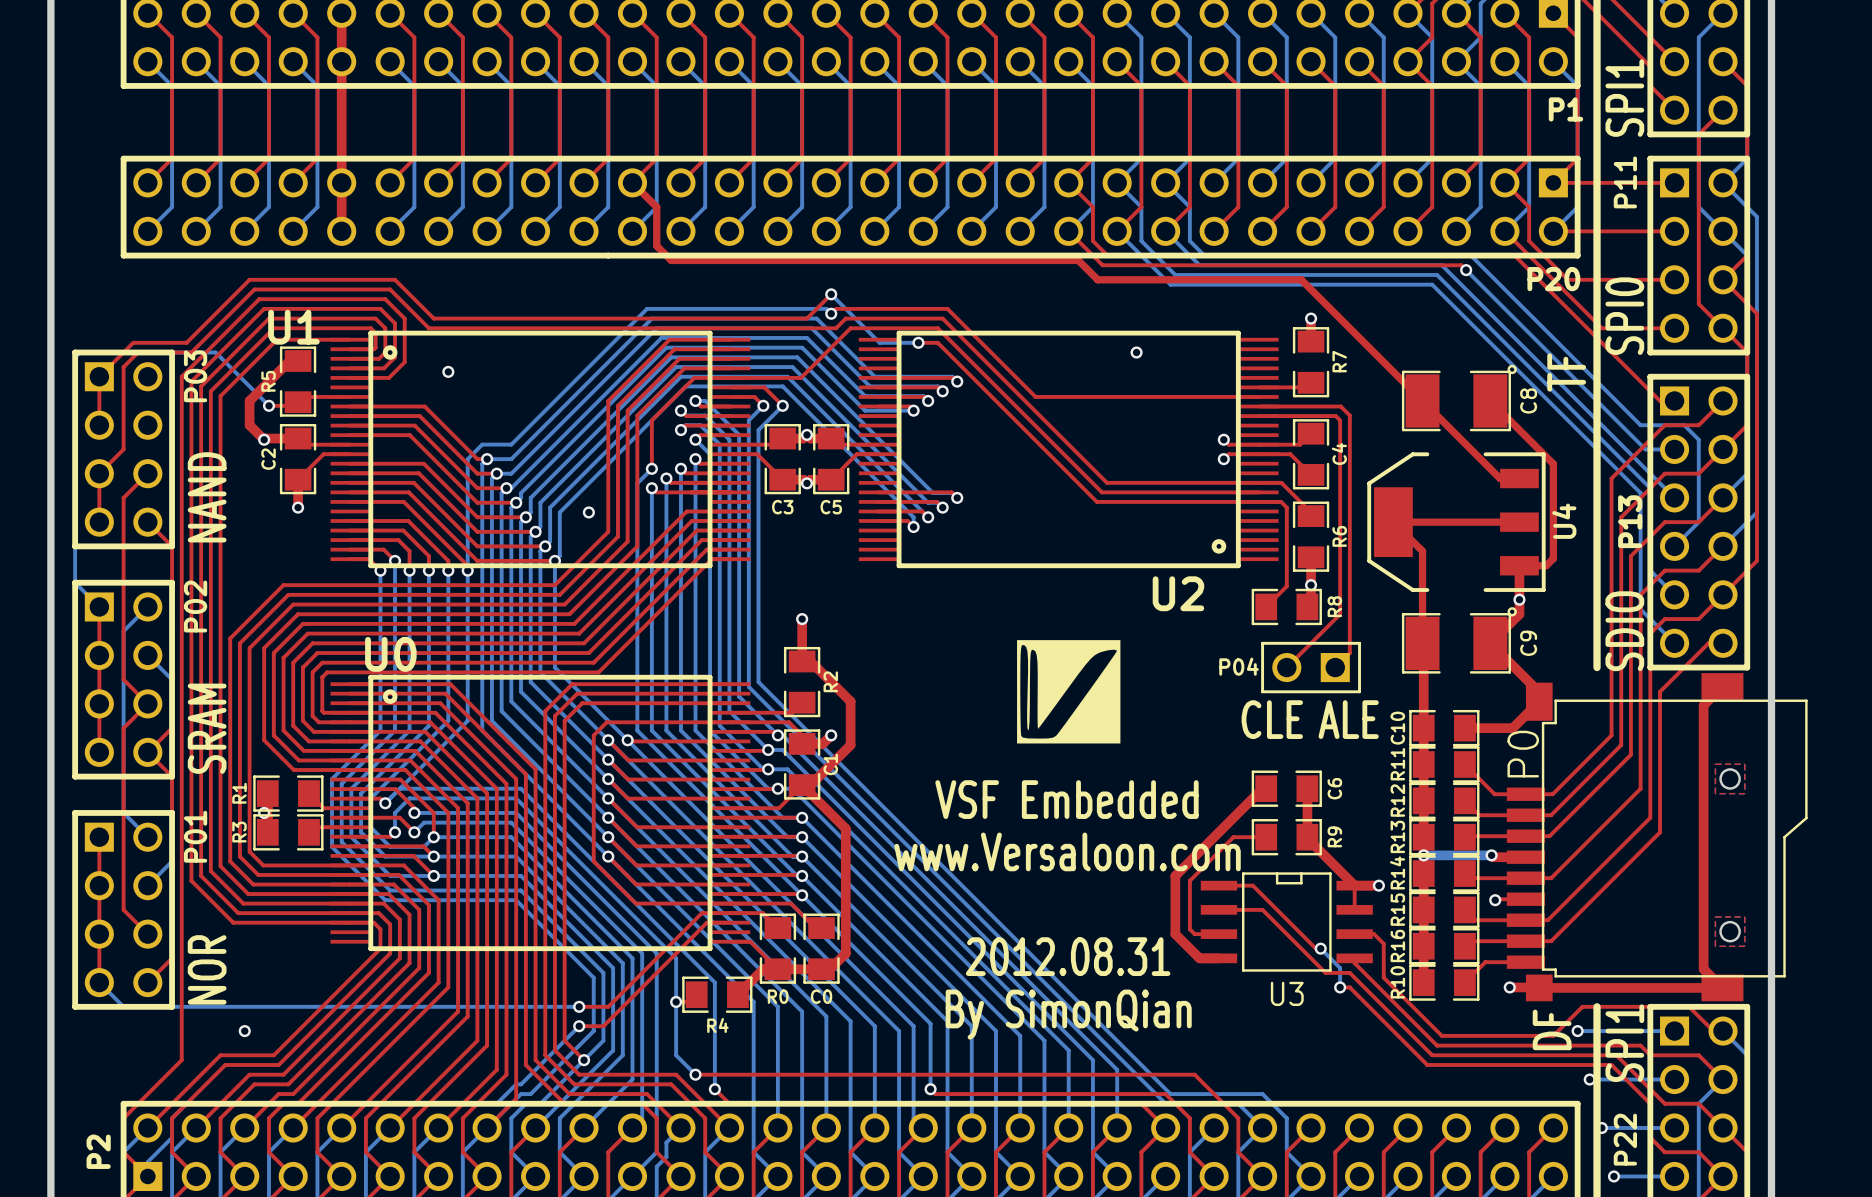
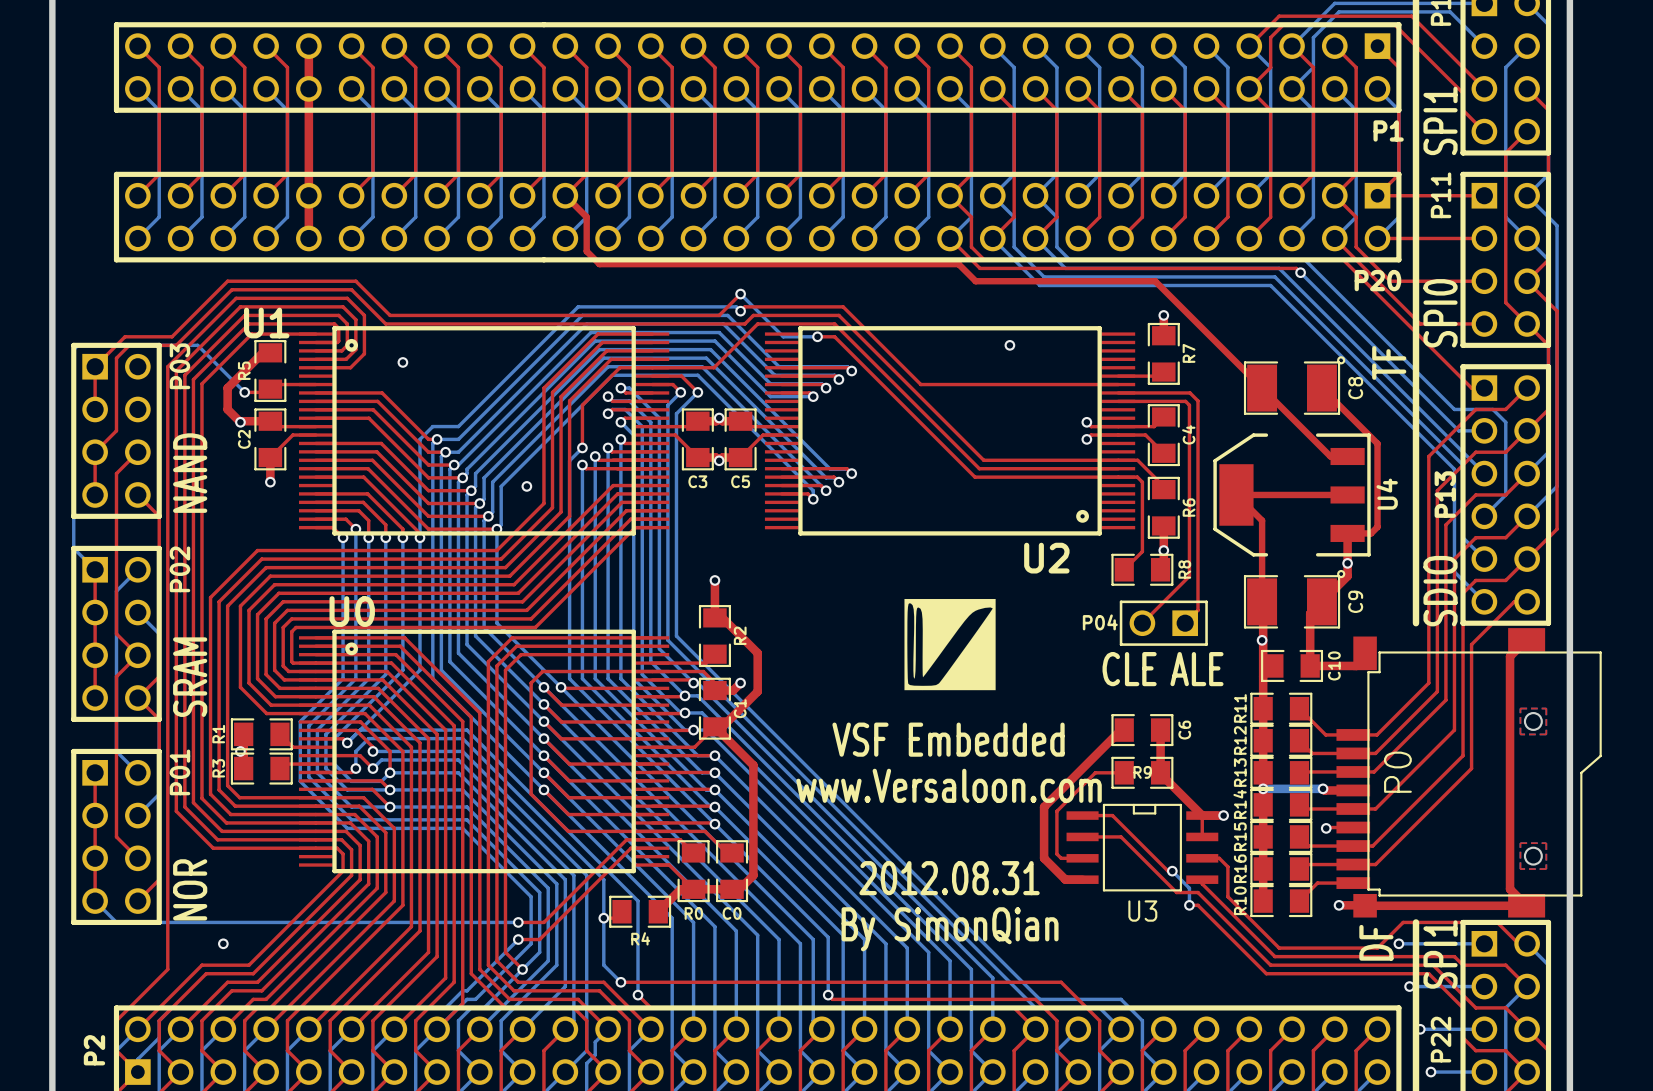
top track: (1490, 643) (1539, 692) (1539, 701) (1512, 728) (1464, 728) -> (1321, 601) (1310, 613) (1310, 665) (1356, 665) (1365, 657)
via: none -> (1262, 640)
C10 name position: C10 (1397, 728) -> C10 (1334, 665)
C10 position: (1444, 728) -> (1292, 665)
P0 name position: P0 (1523, 754) -> P0 (1397, 772)
R9 name rotation: 0° (1334, 836) -> 90° clockwise (1142, 772)
R9 name position: R9 (1334, 836) -> R9 (1142, 772)

